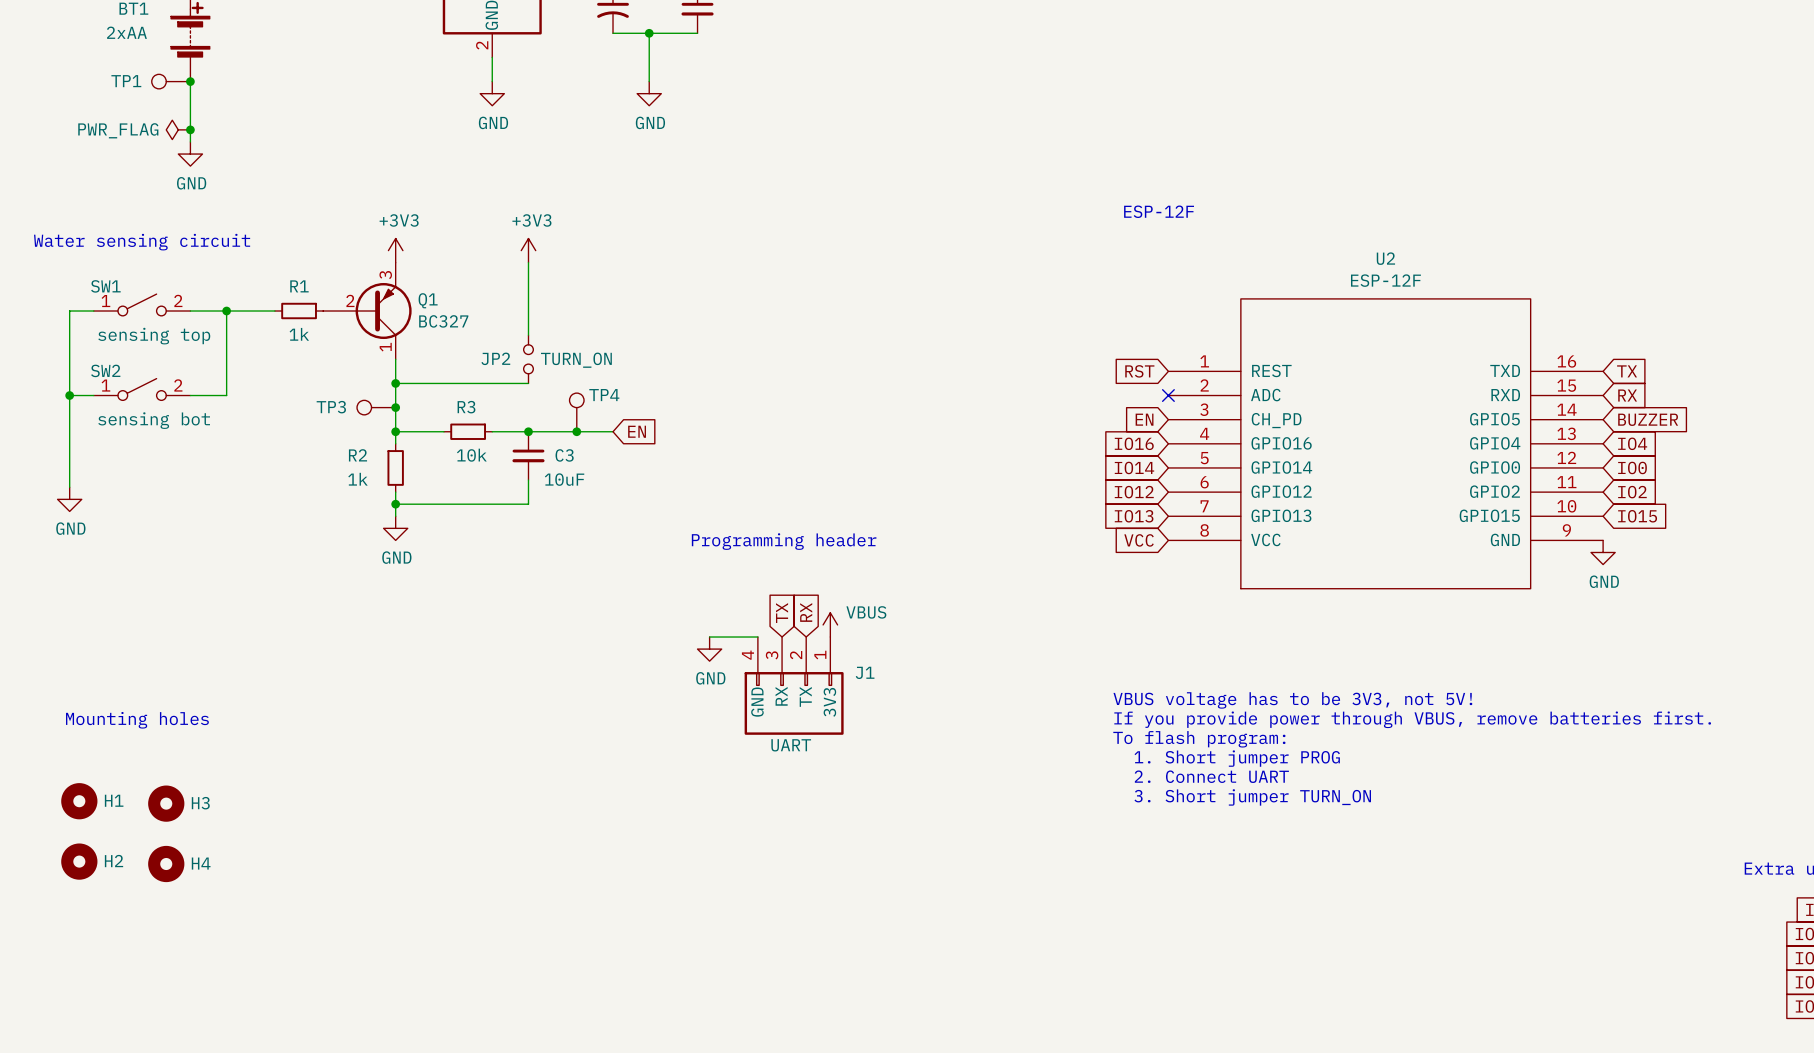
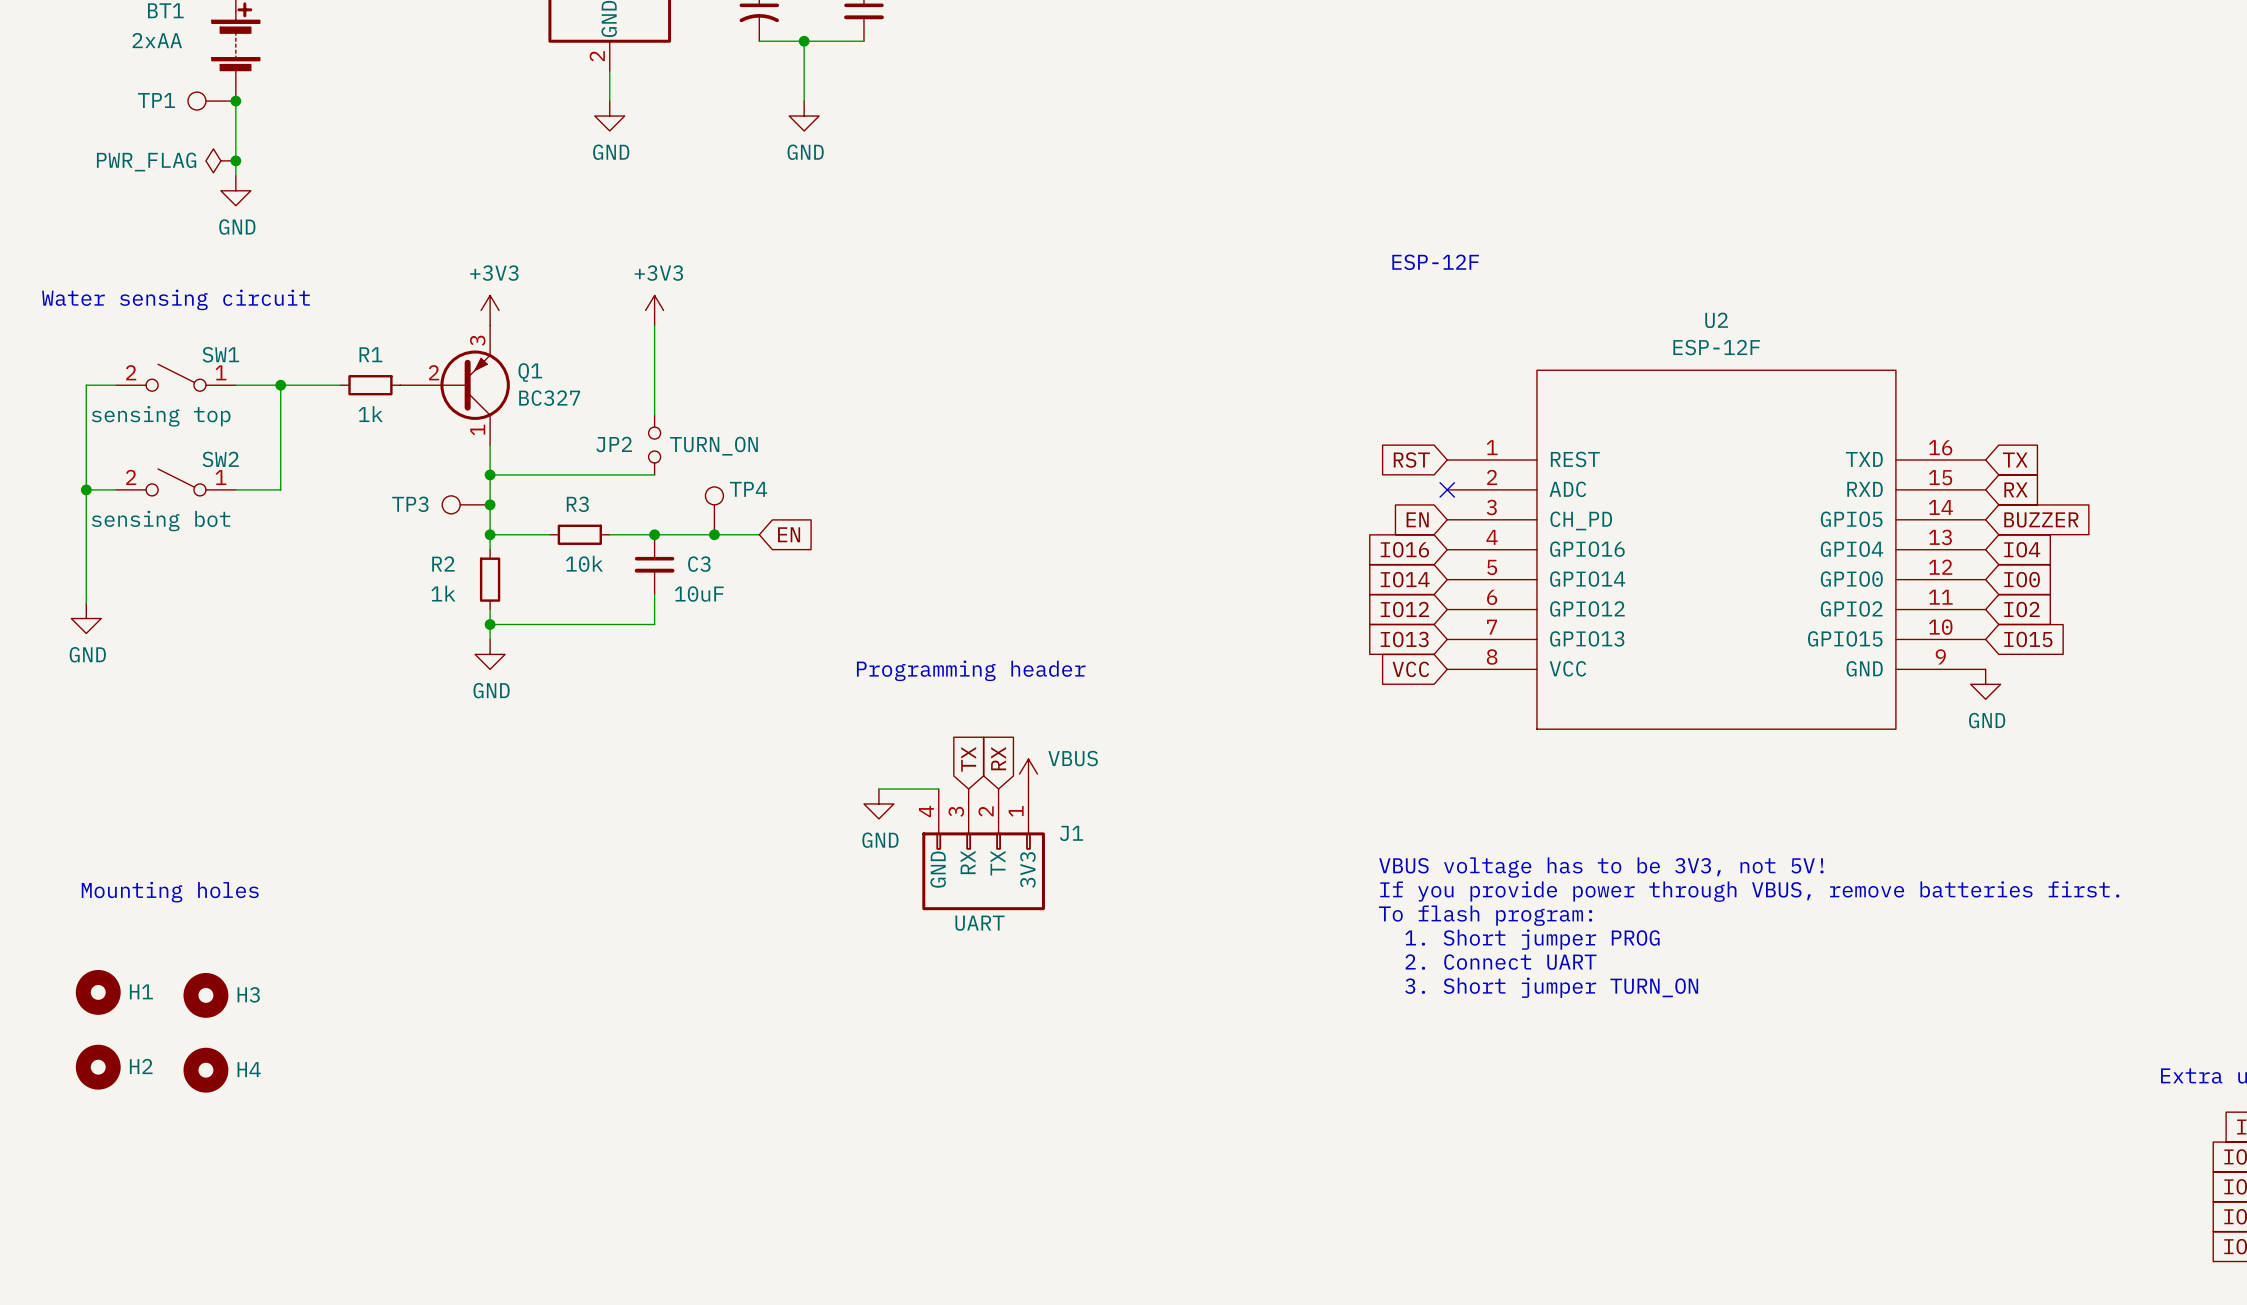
SW1 flip: as is (142, 304) -> left-right (176, 377)
SW2 flip: as is (142, 389) -> left-right (176, 482)

